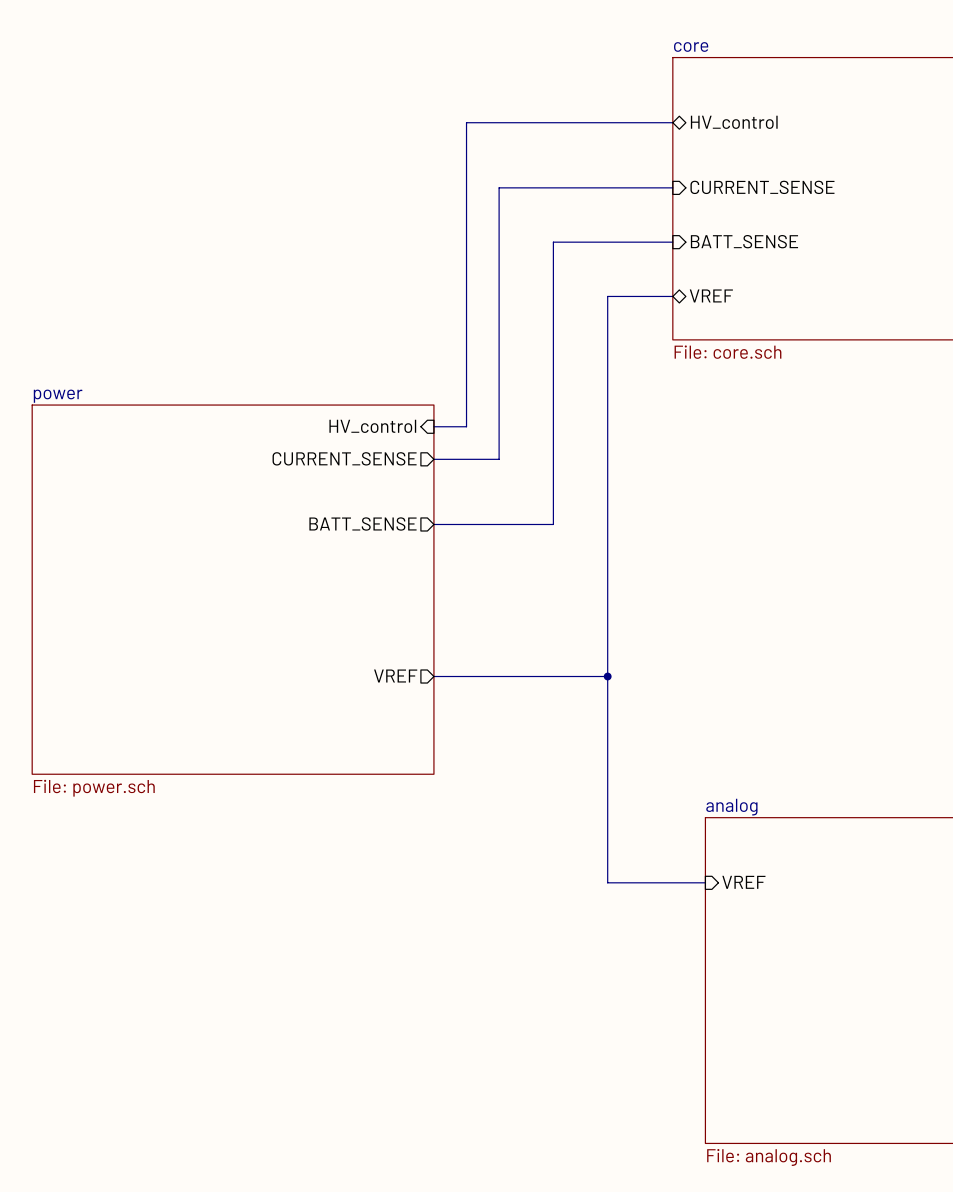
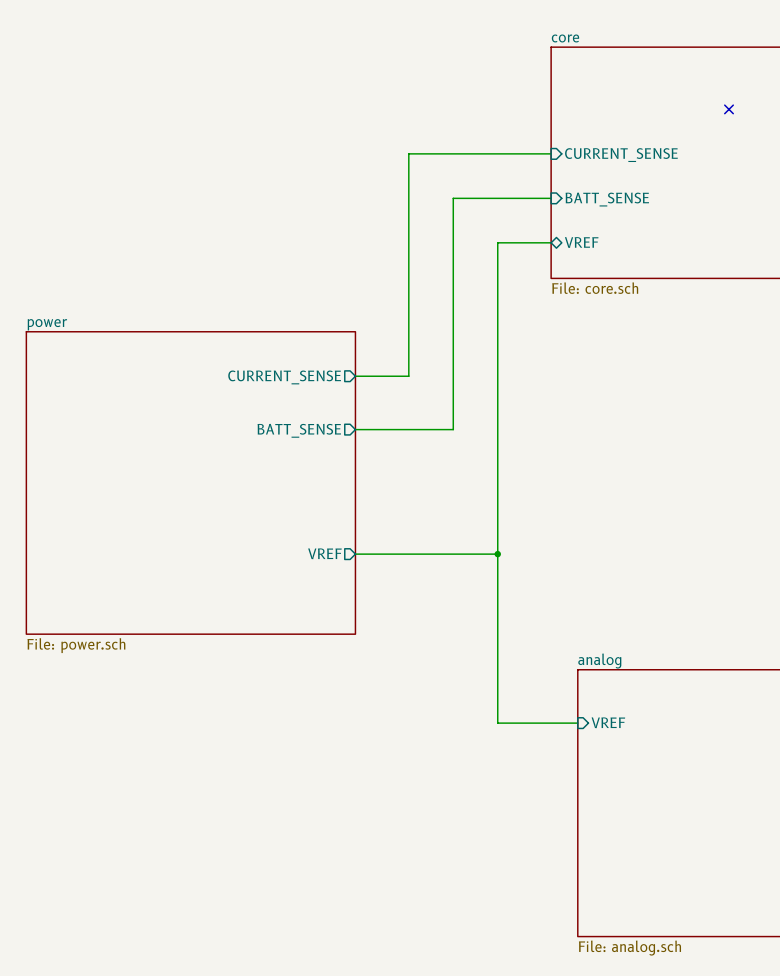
wire: (672, 122) (466, 122) (466, 426) (433, 426) -> none
sheet pin: HV_control (734, 122) -> none
no-connect mark: none -> (729, 109)
sheet pin: HV_control (372, 426) -> none

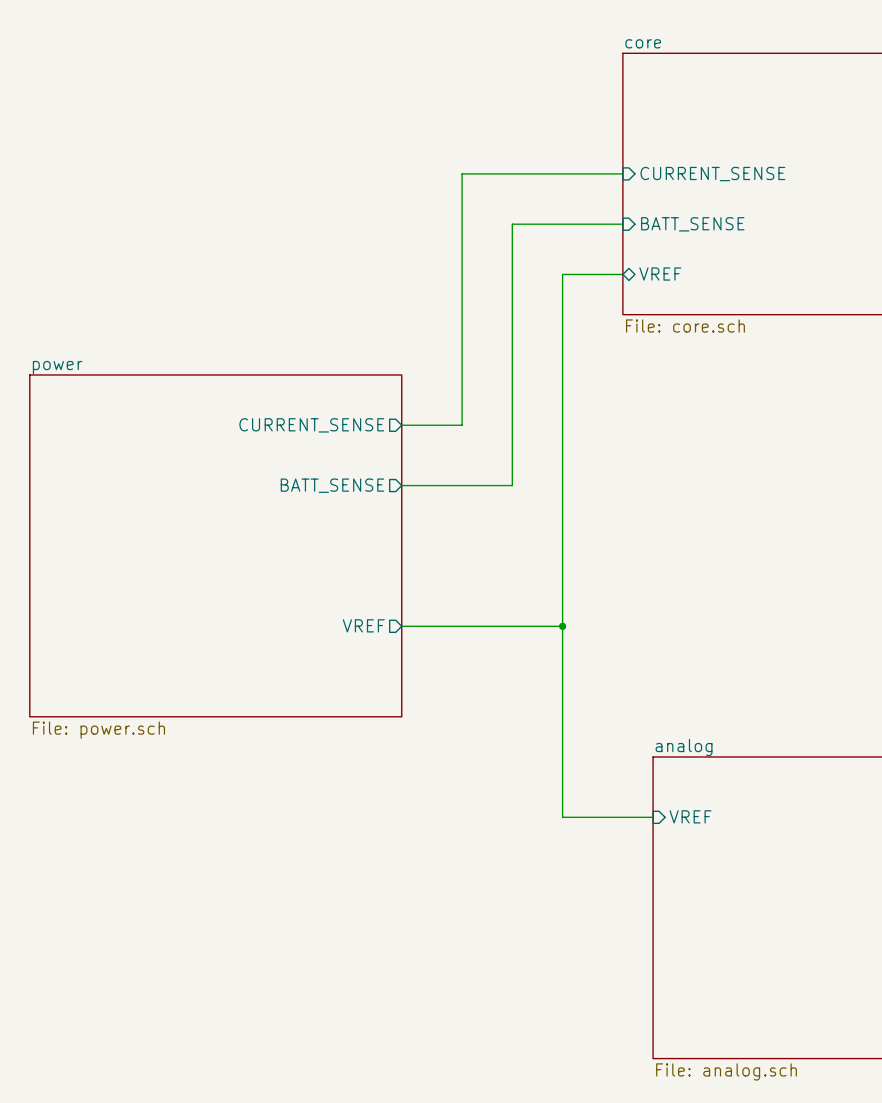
no-connect mark: (729, 109) -> none

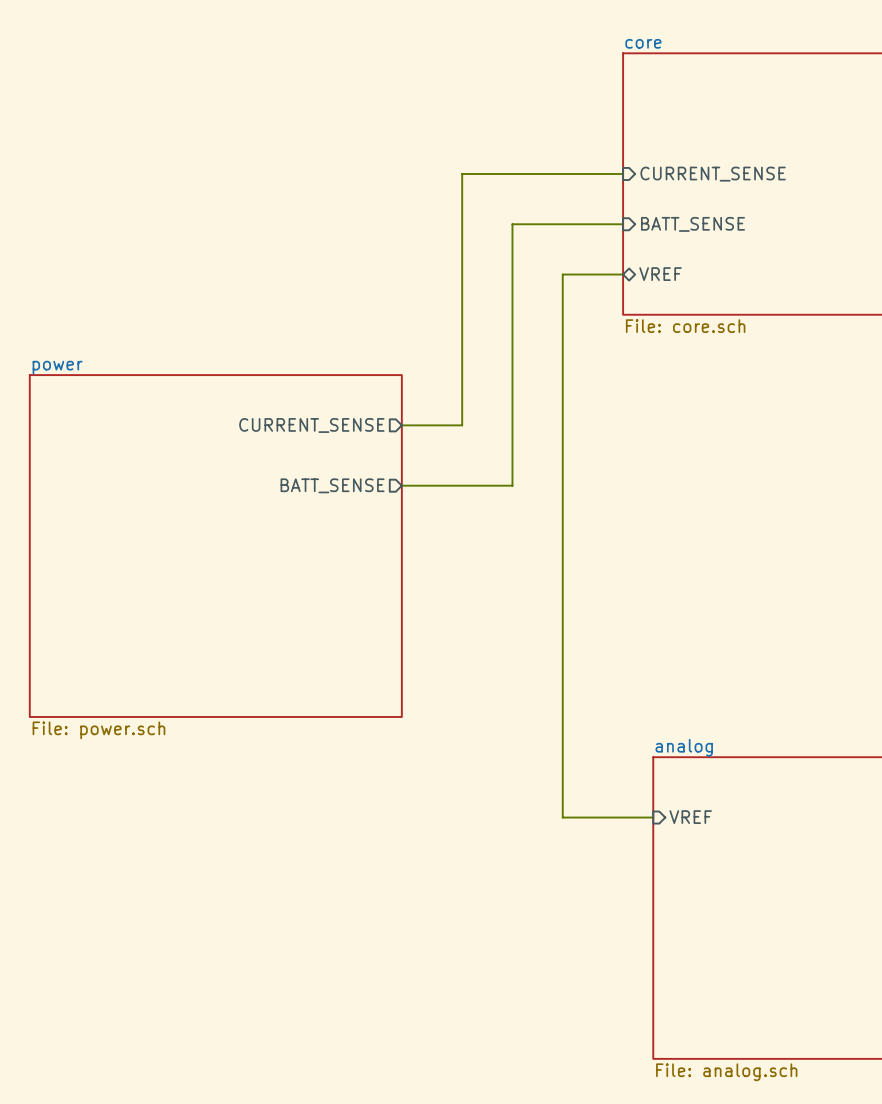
sheet pin: VREF (363, 625) -> none
wire: (401, 626) (562, 626) -> none
junction: (562, 626) -> none

